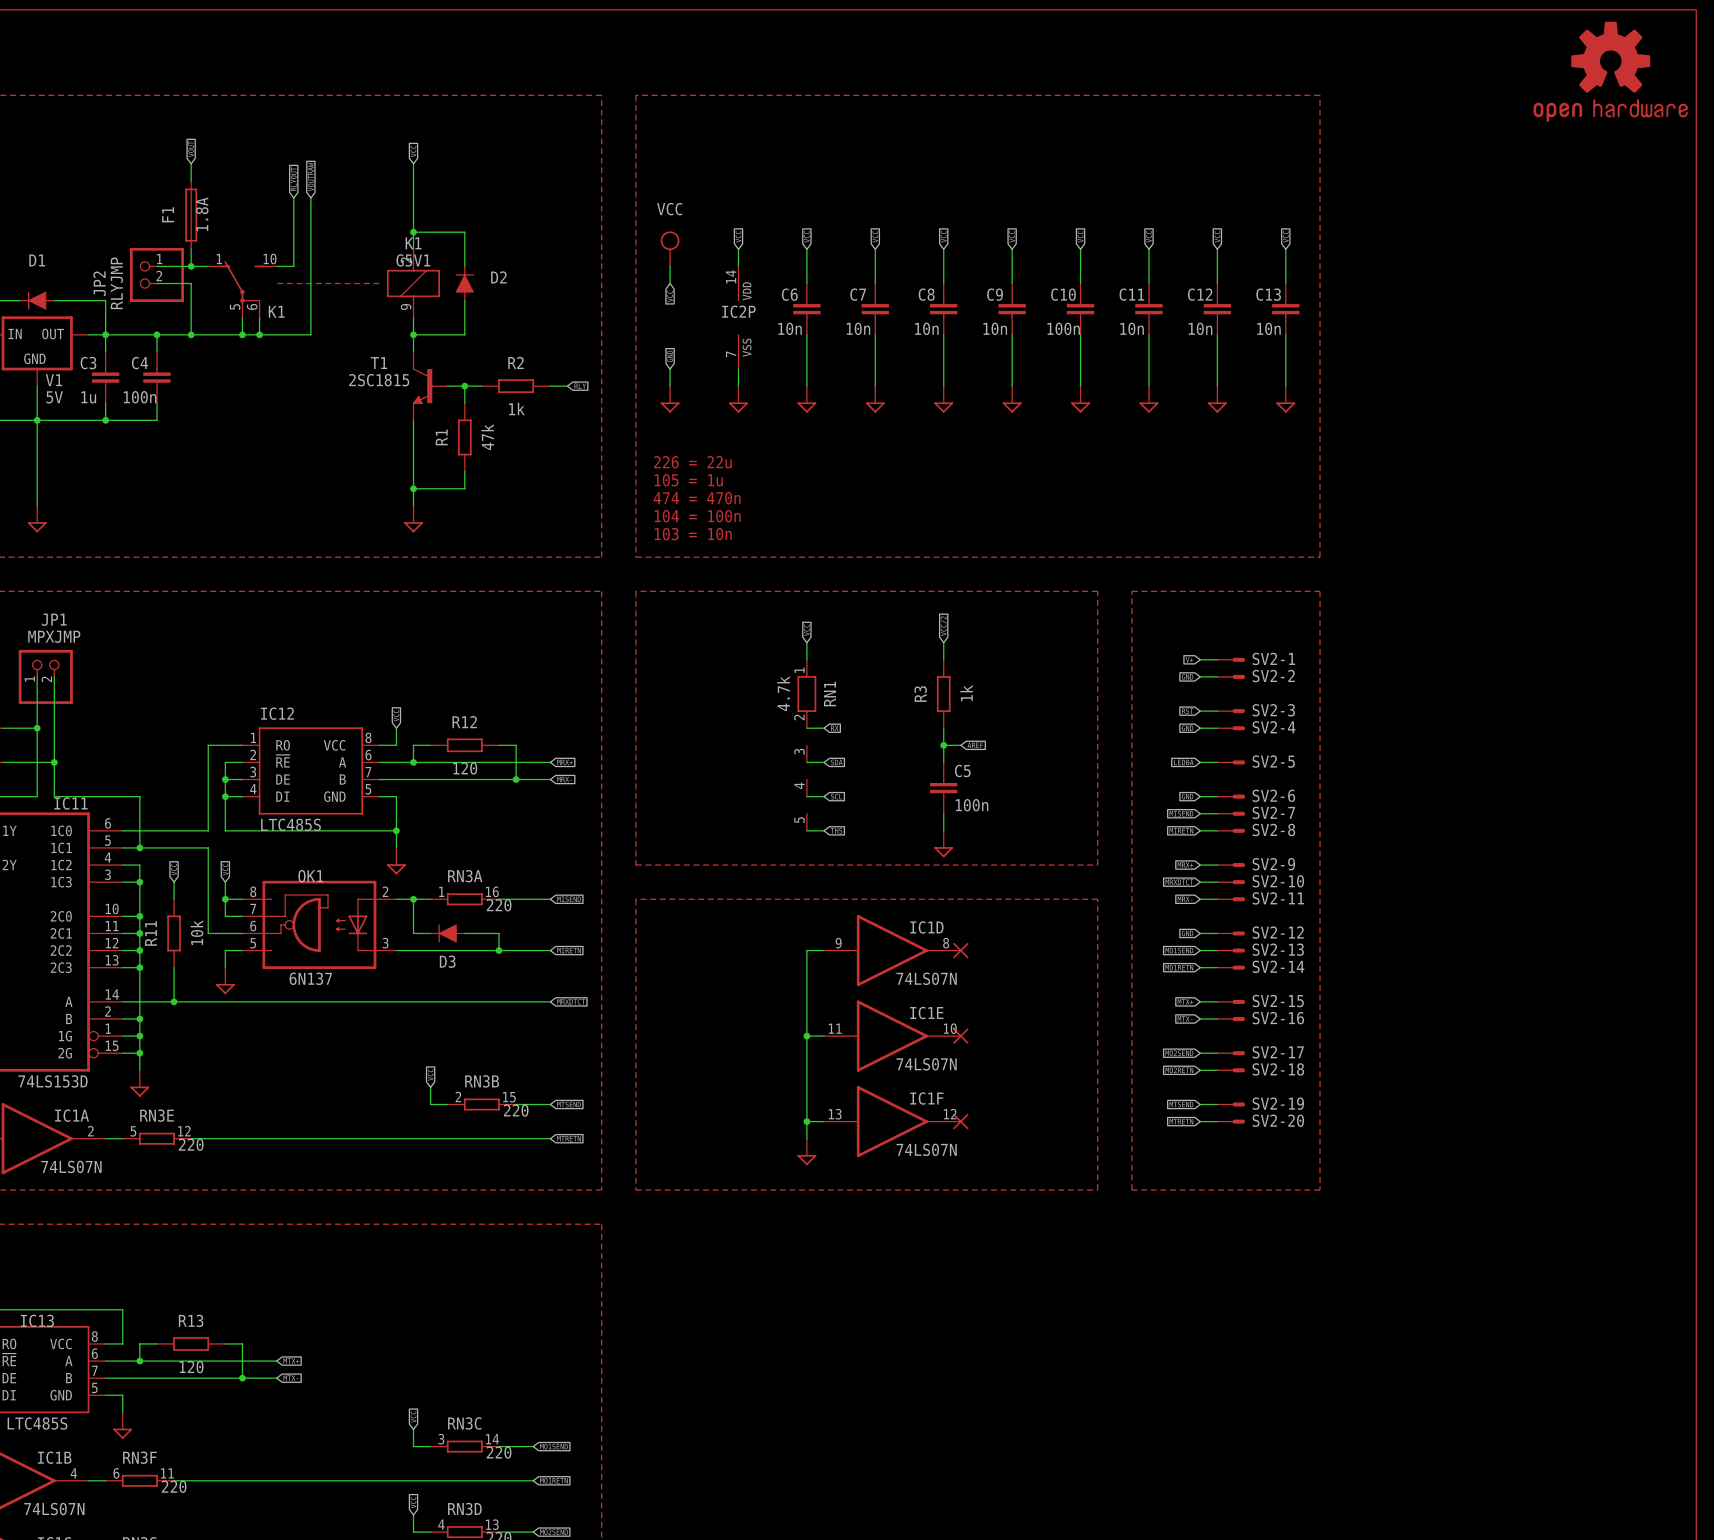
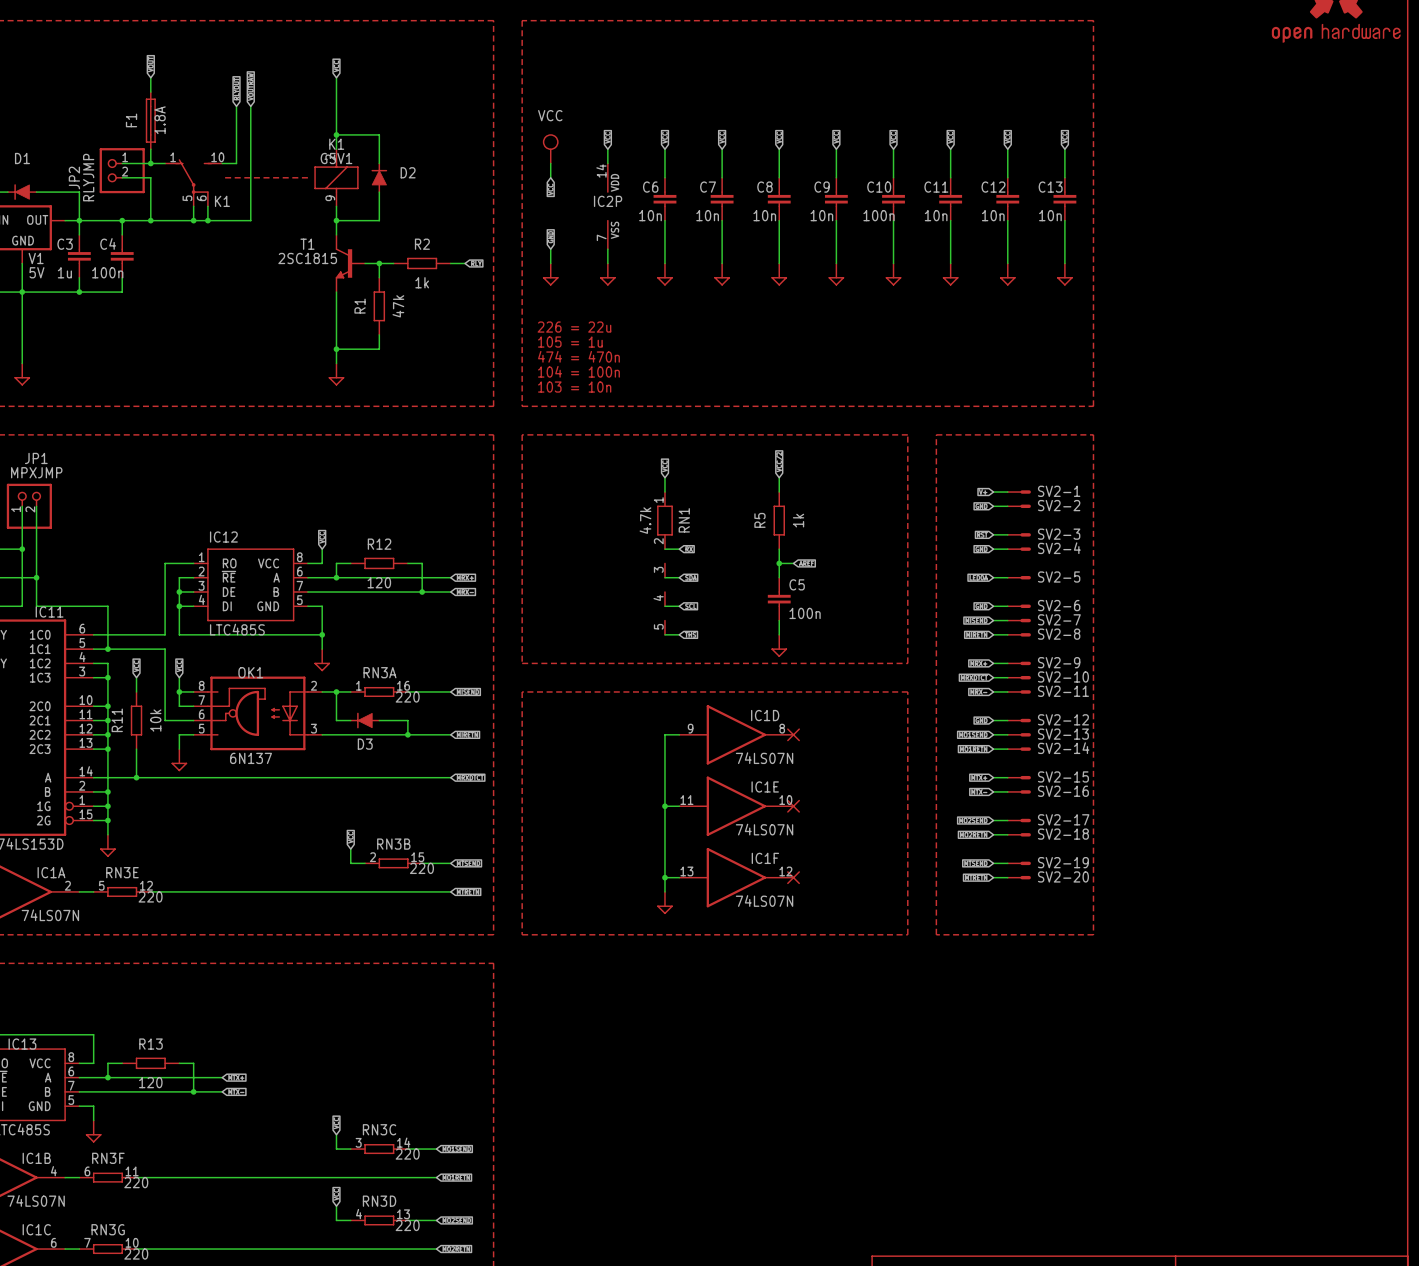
R3 name: R3 (920, 694) -> R5 (759, 520)

